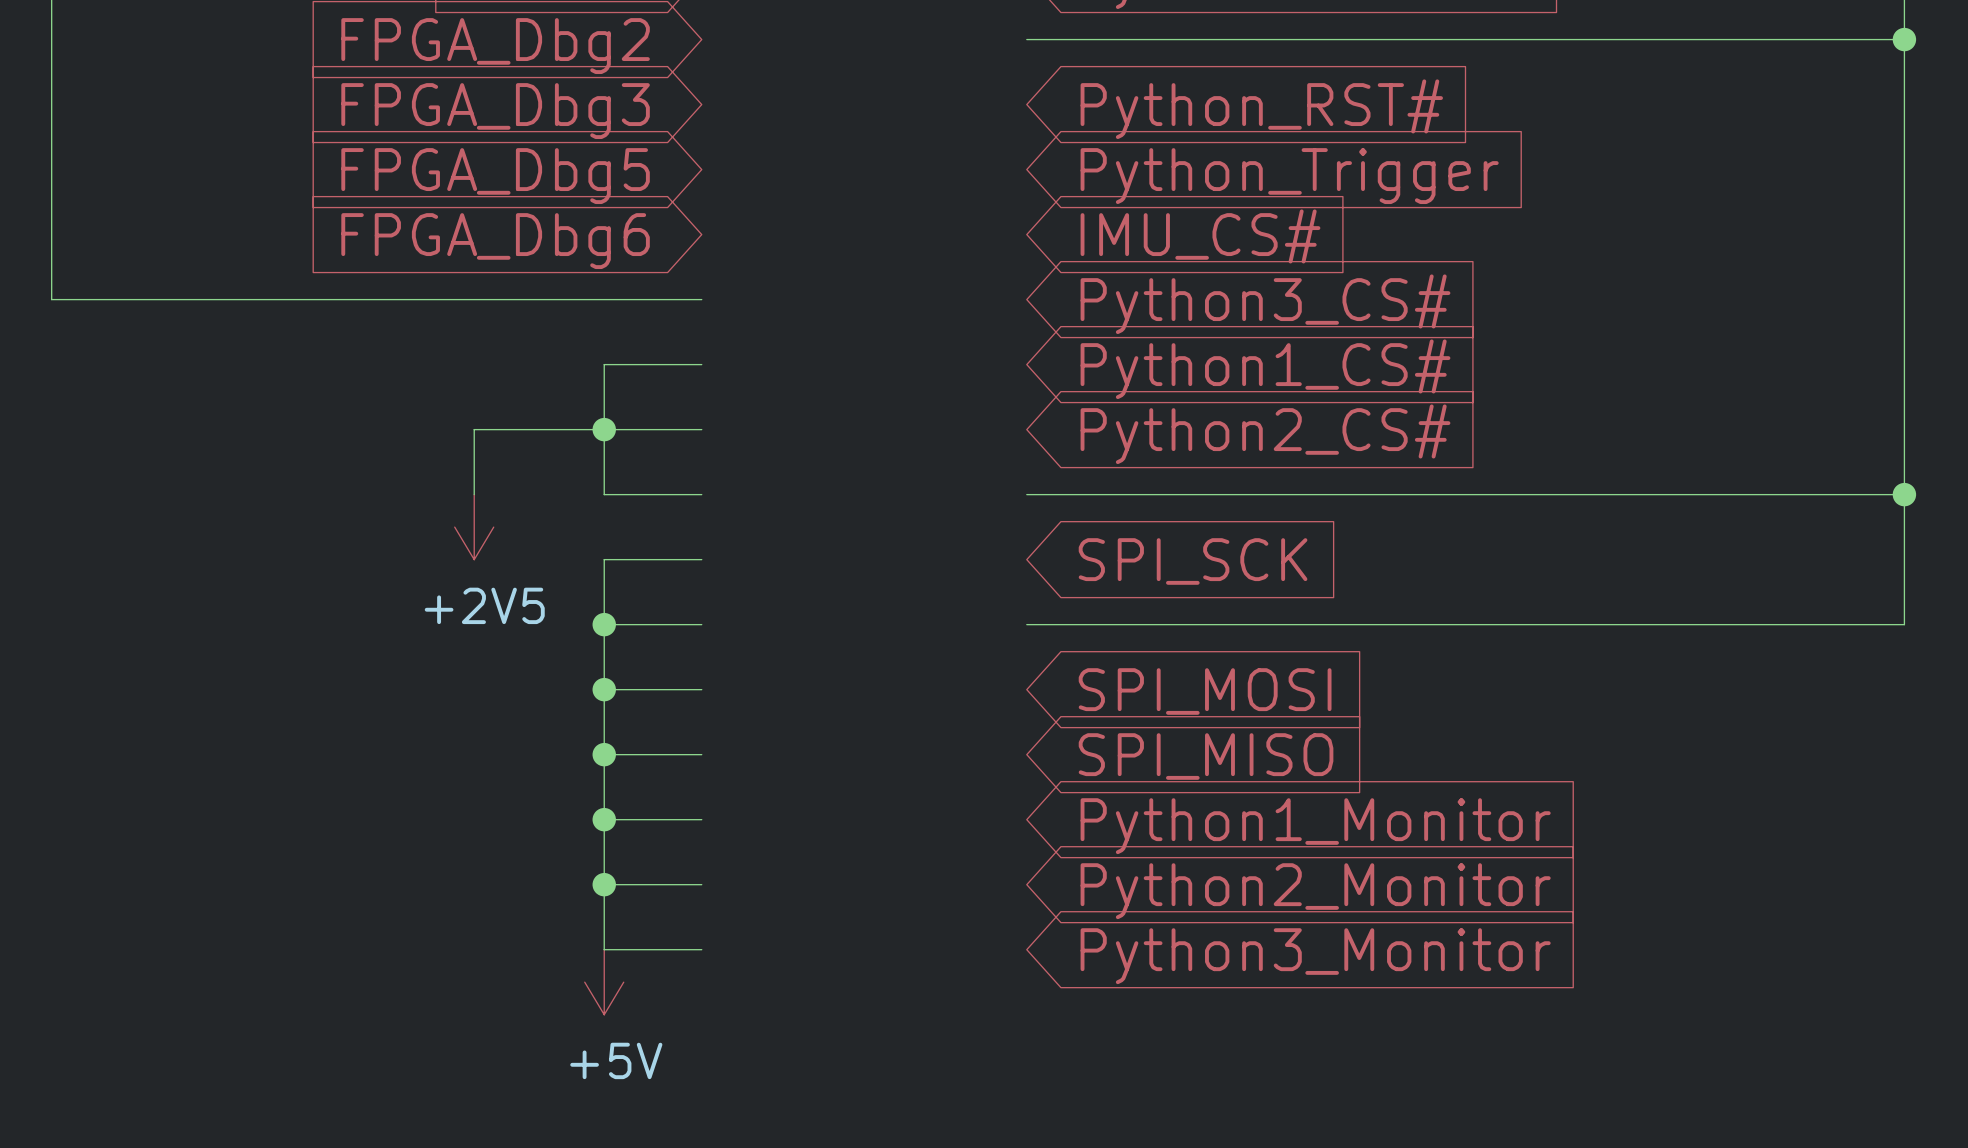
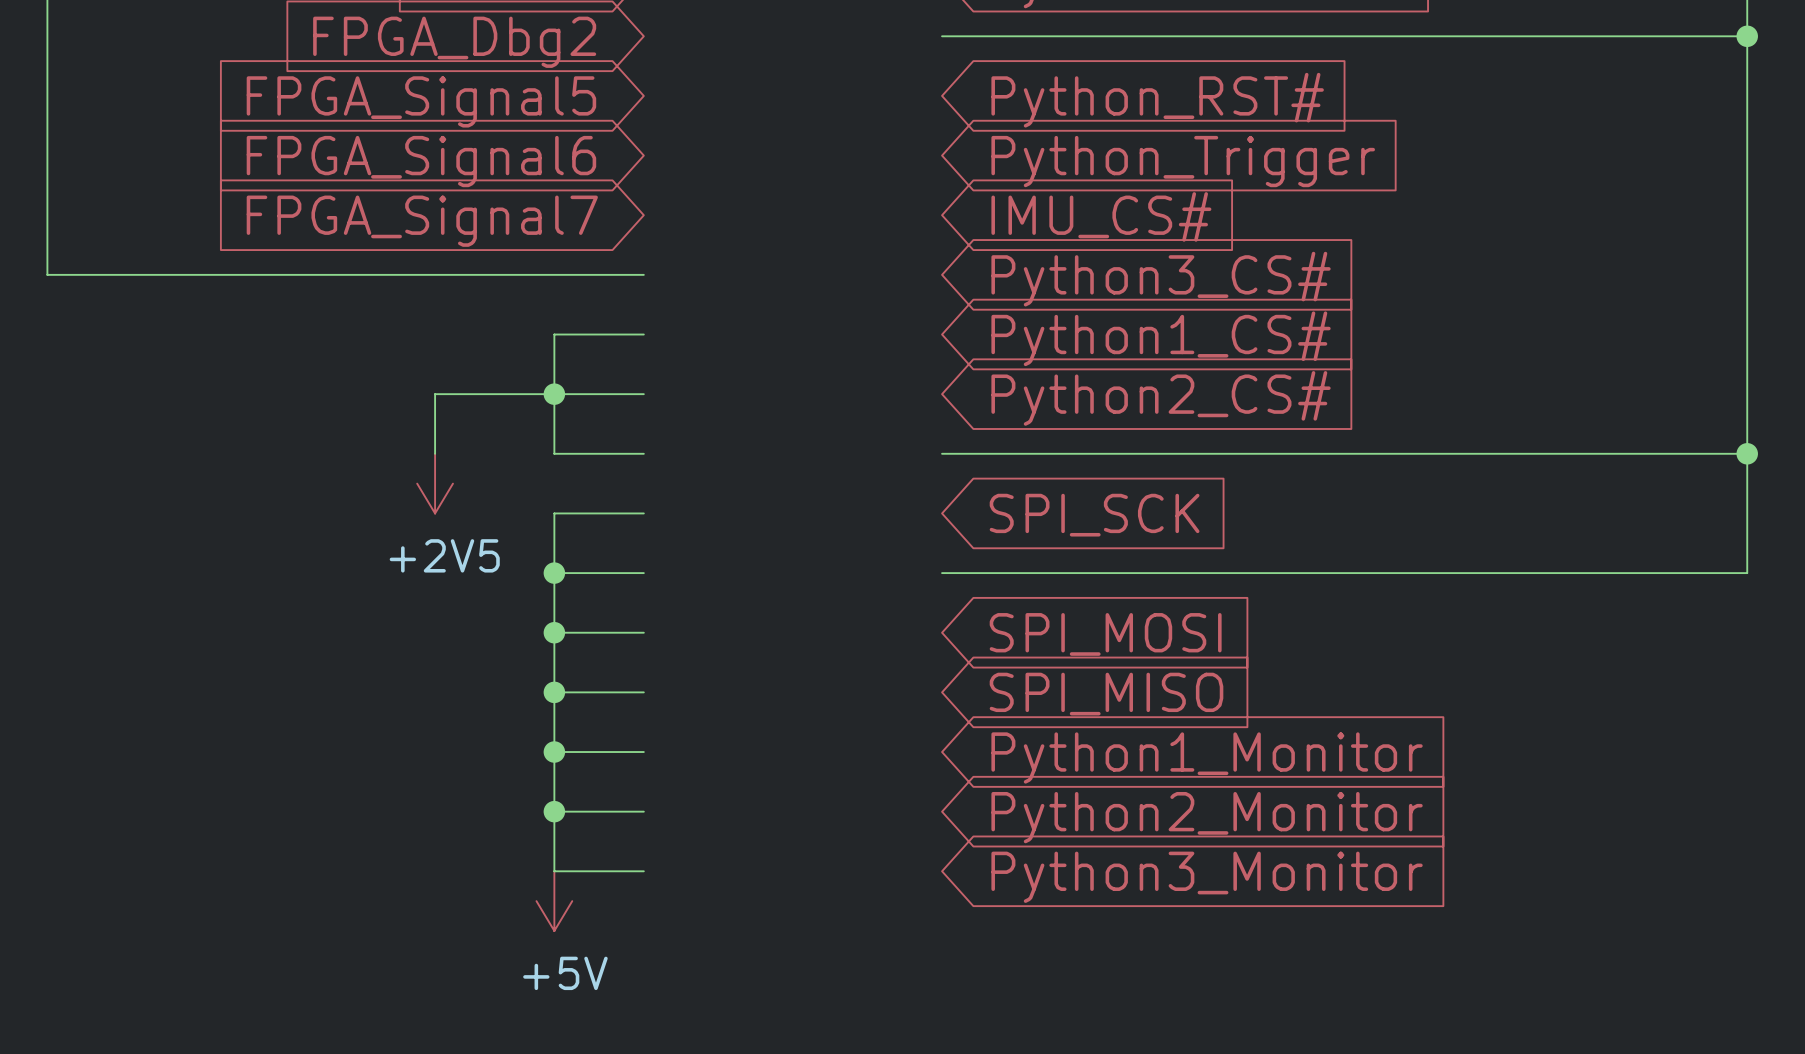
global label: FPGA_Dbg3 (495, 111) -> FPGA_Signal5 (421, 101)
global label: FPGA_Dbg5 (495, 176) -> FPGA_Signal6 (421, 161)
global label: FPGA_Dbg6 (495, 241) -> FPGA_Signal7 (422, 221)

